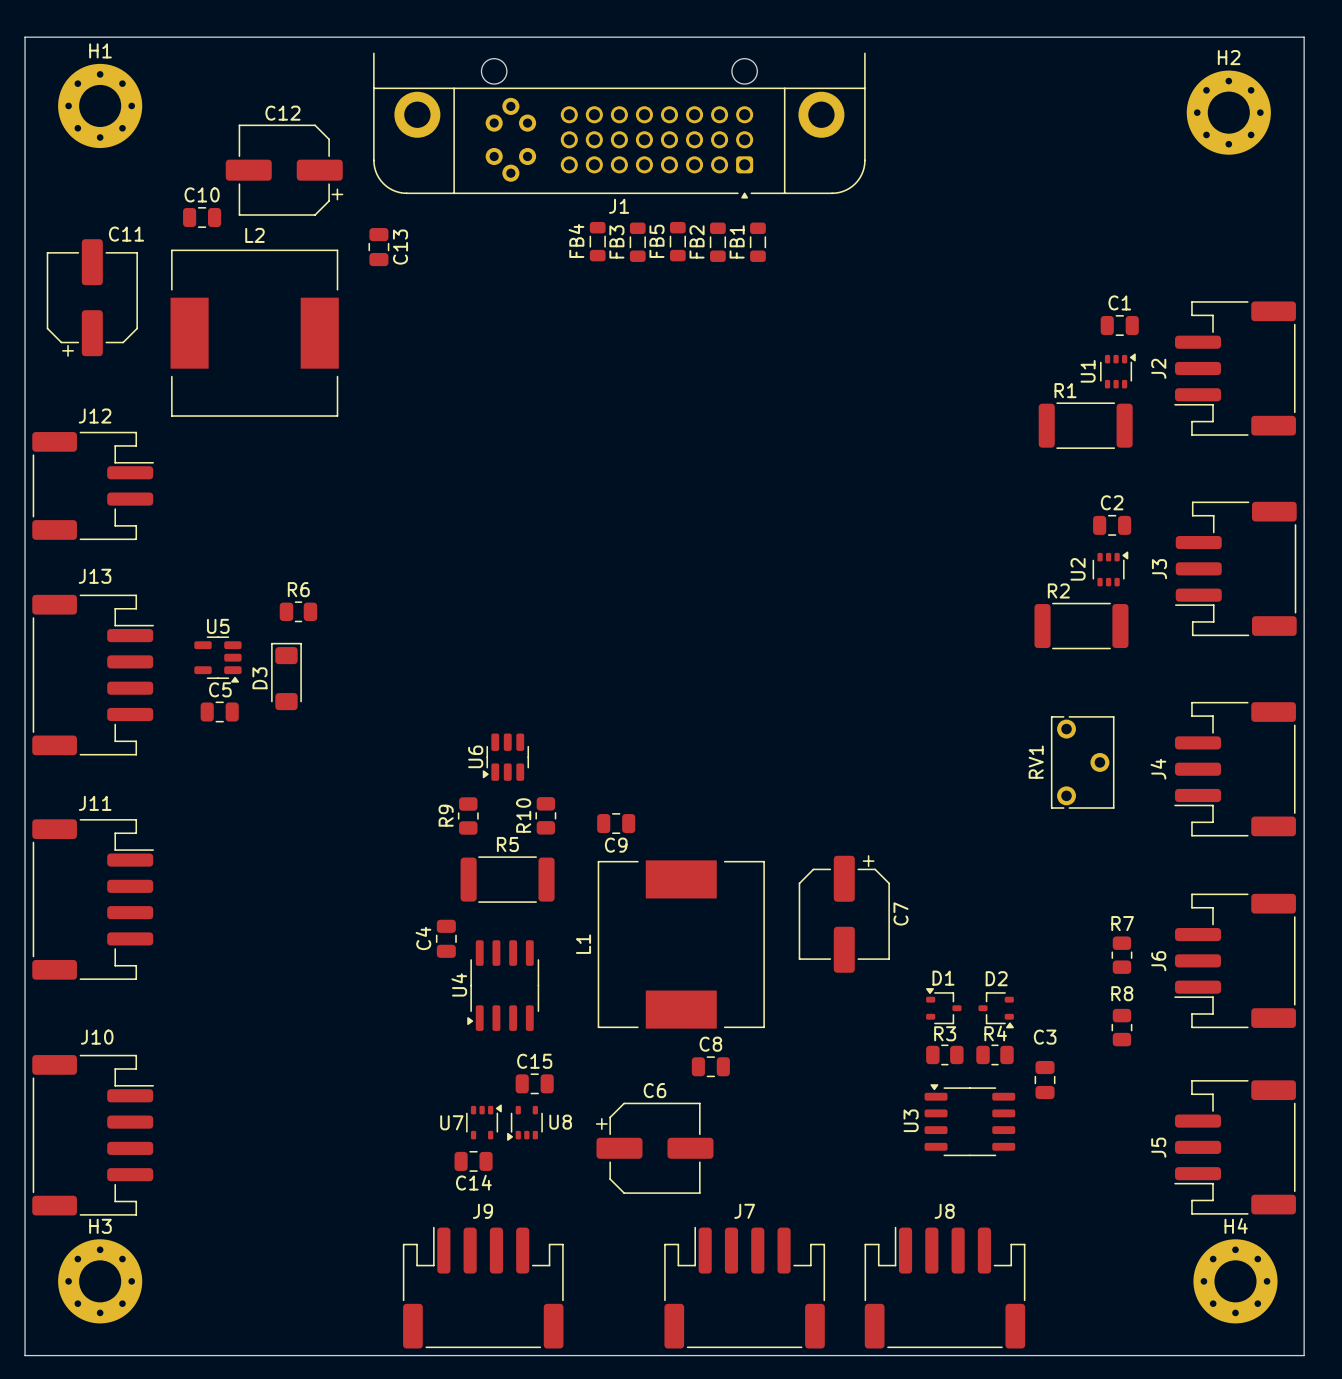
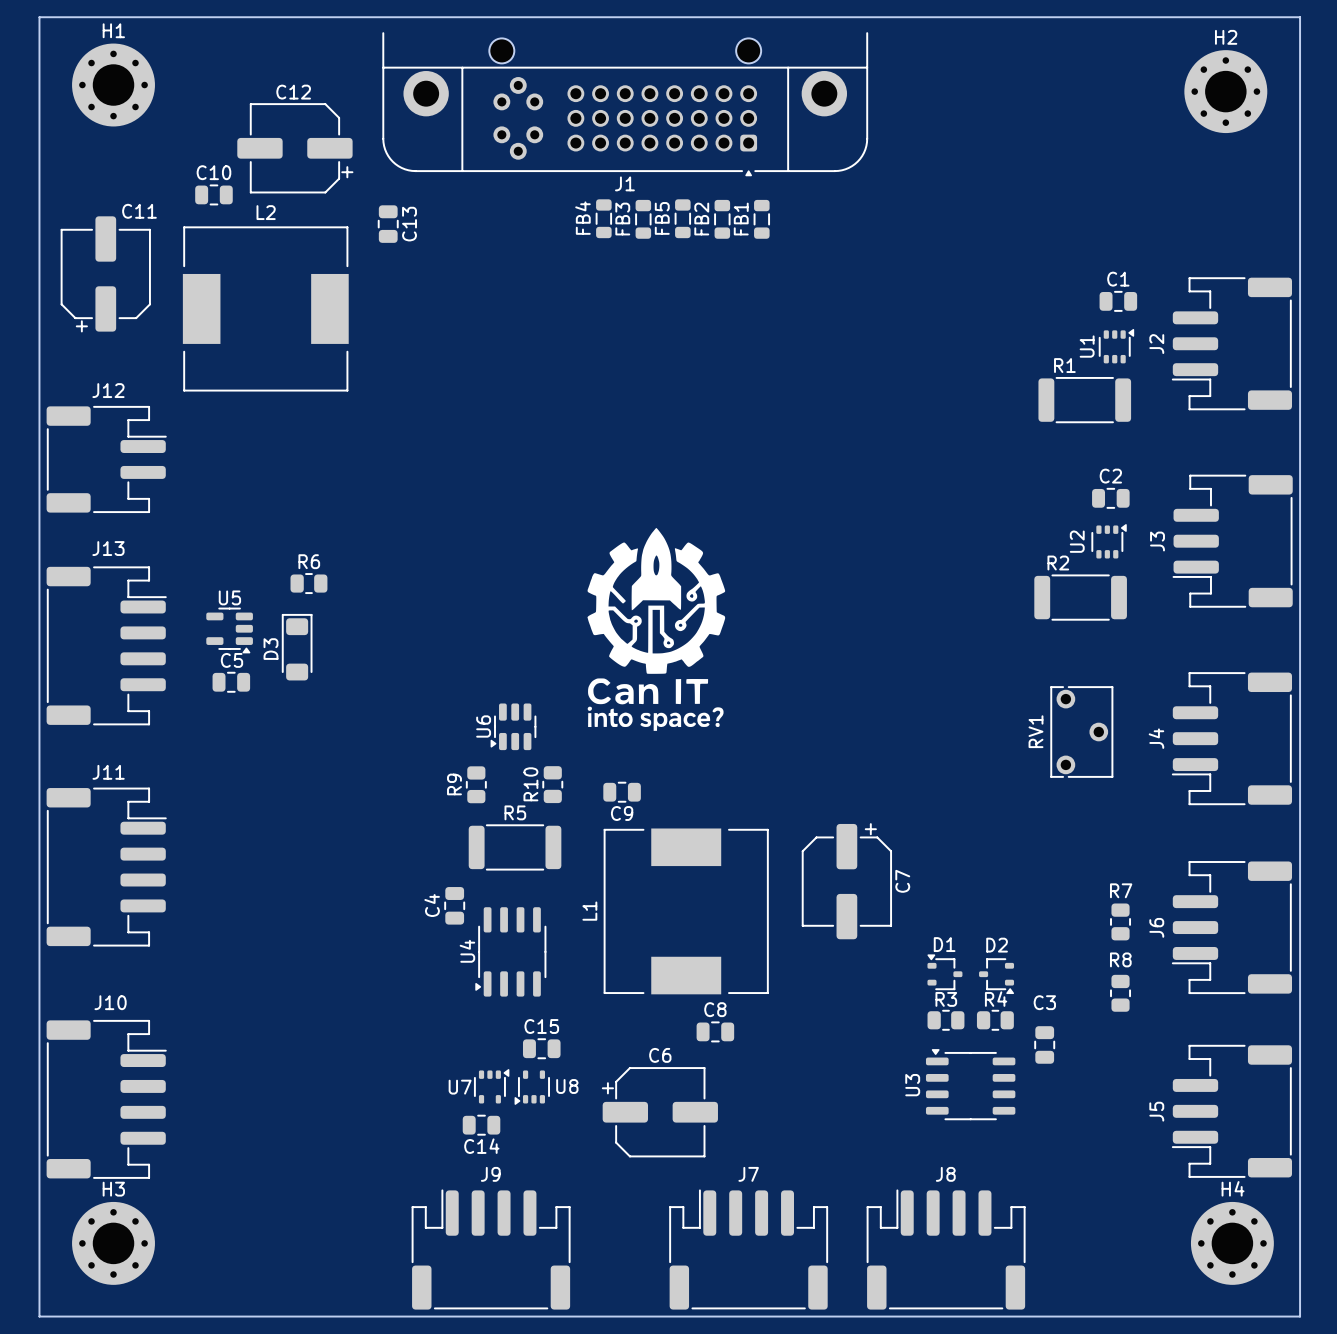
drawing: none -> [587, 527, 726, 731]

